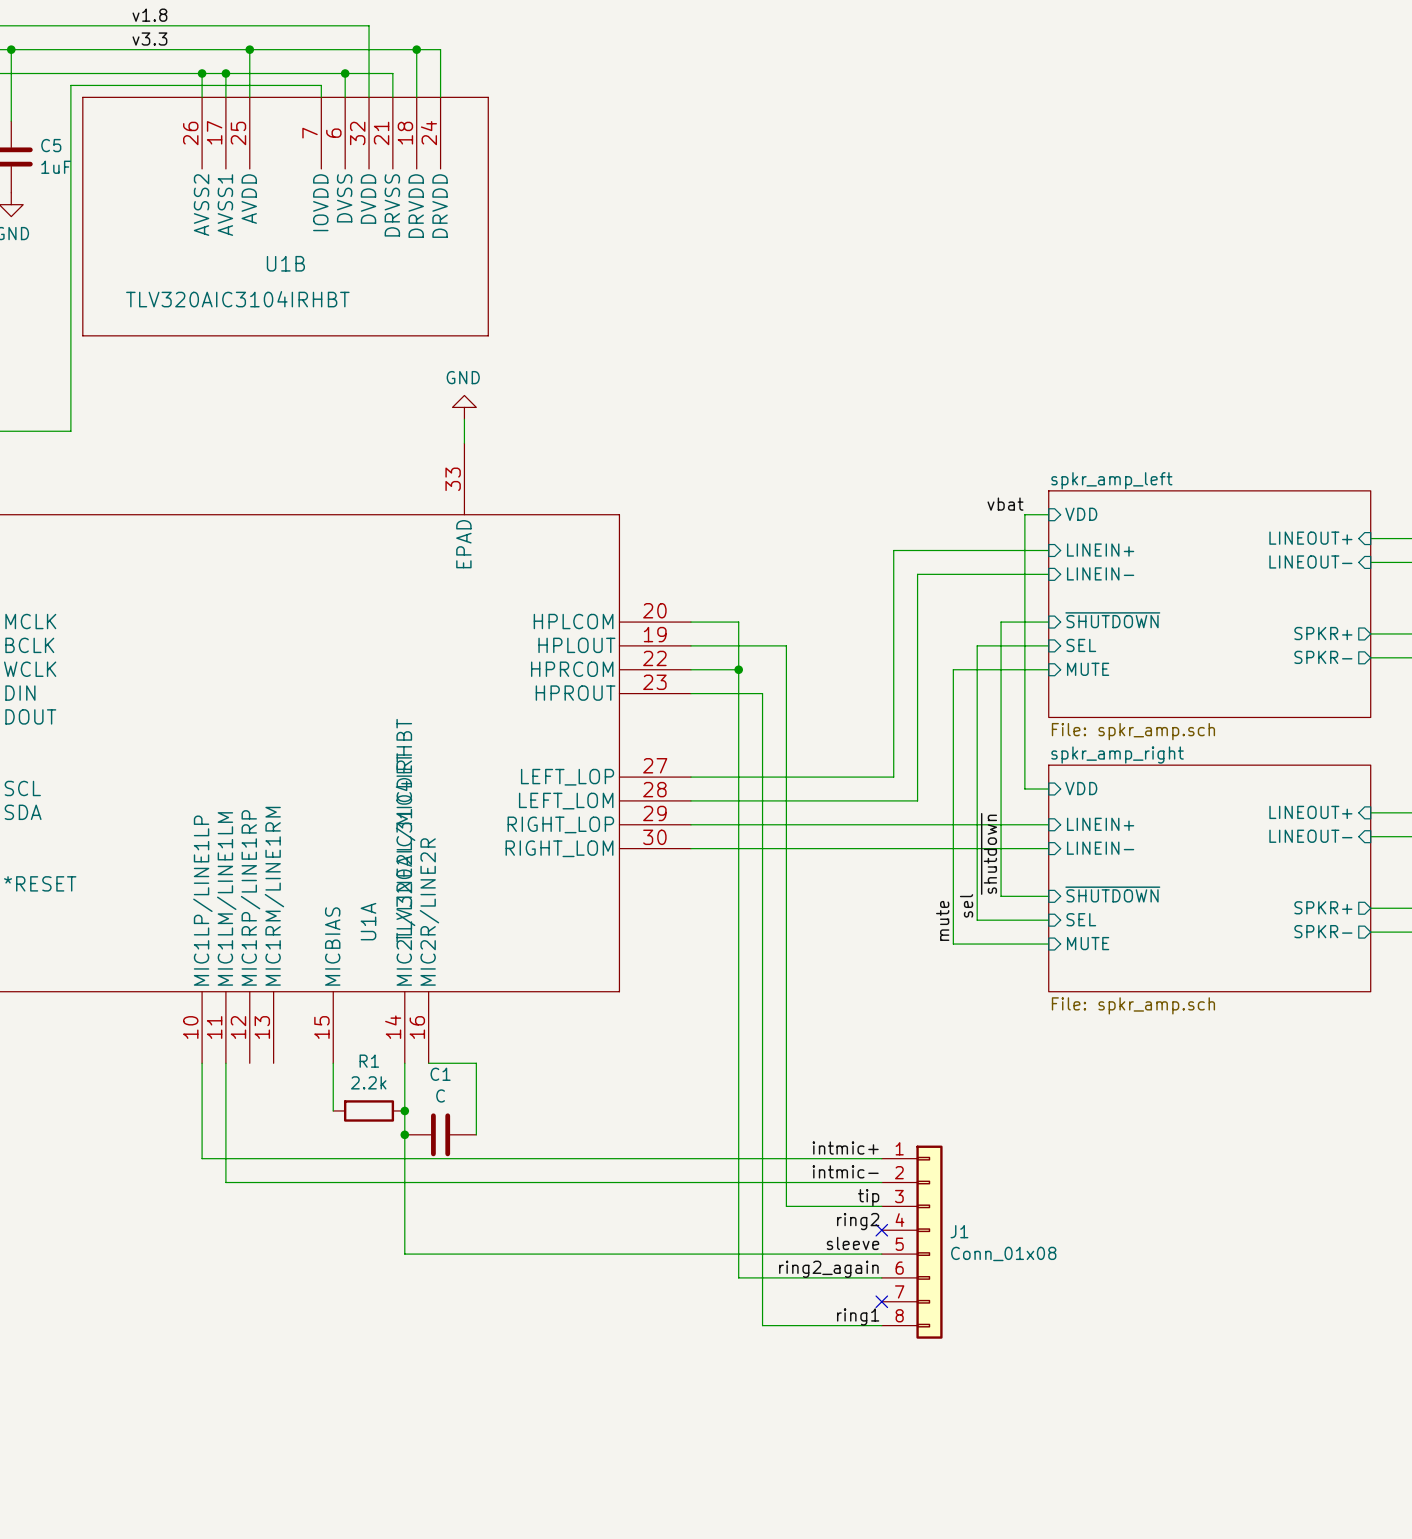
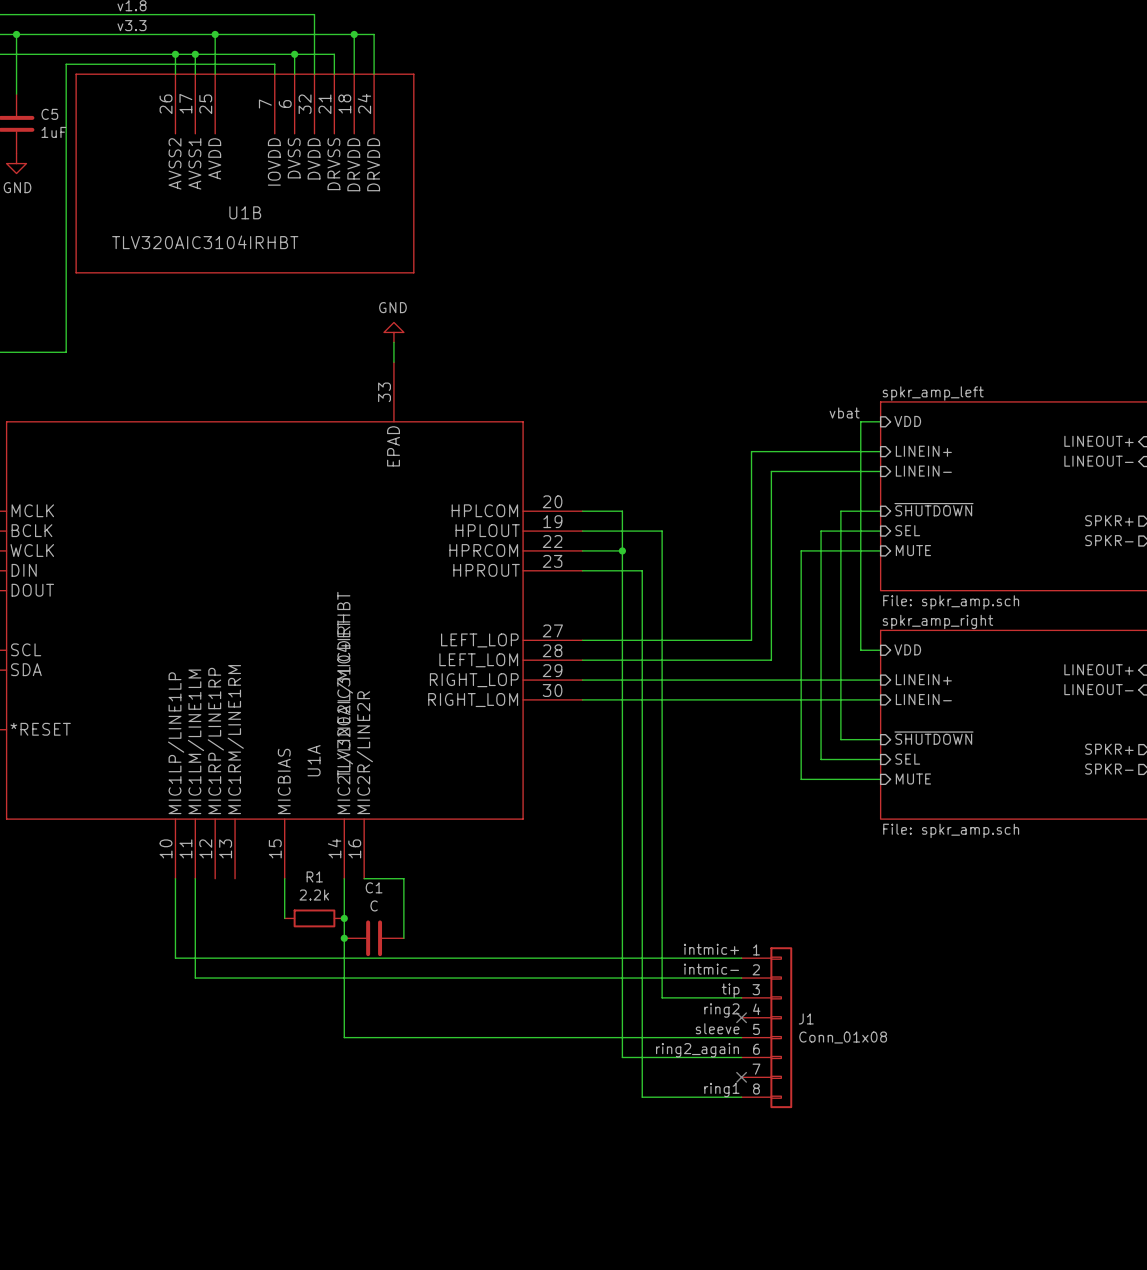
label: ~{shutdown} (989, 853) -> none
label: sel (966, 905) -> none
label: mute (942, 920) -> none

